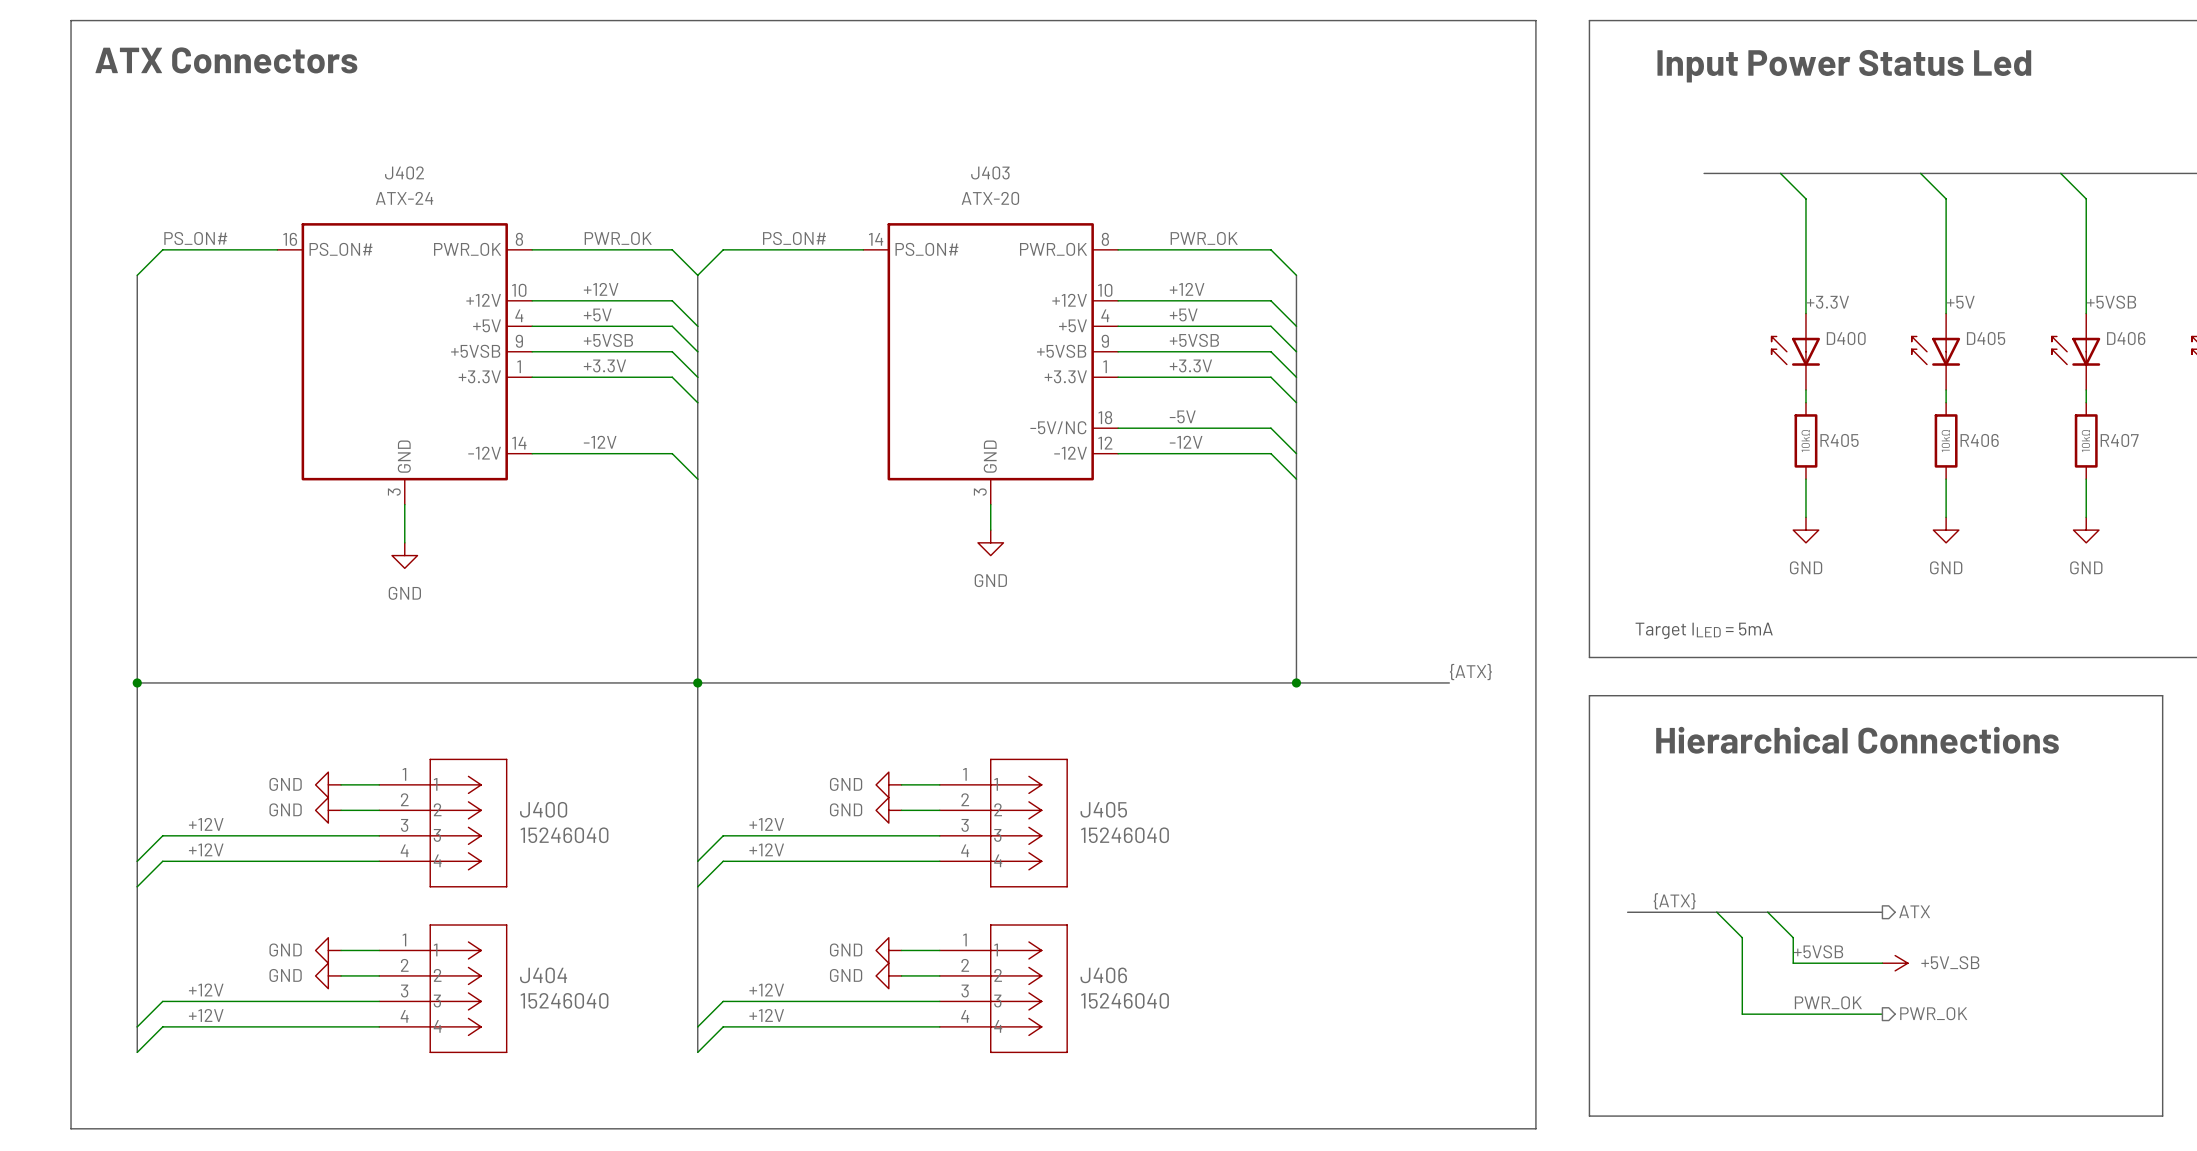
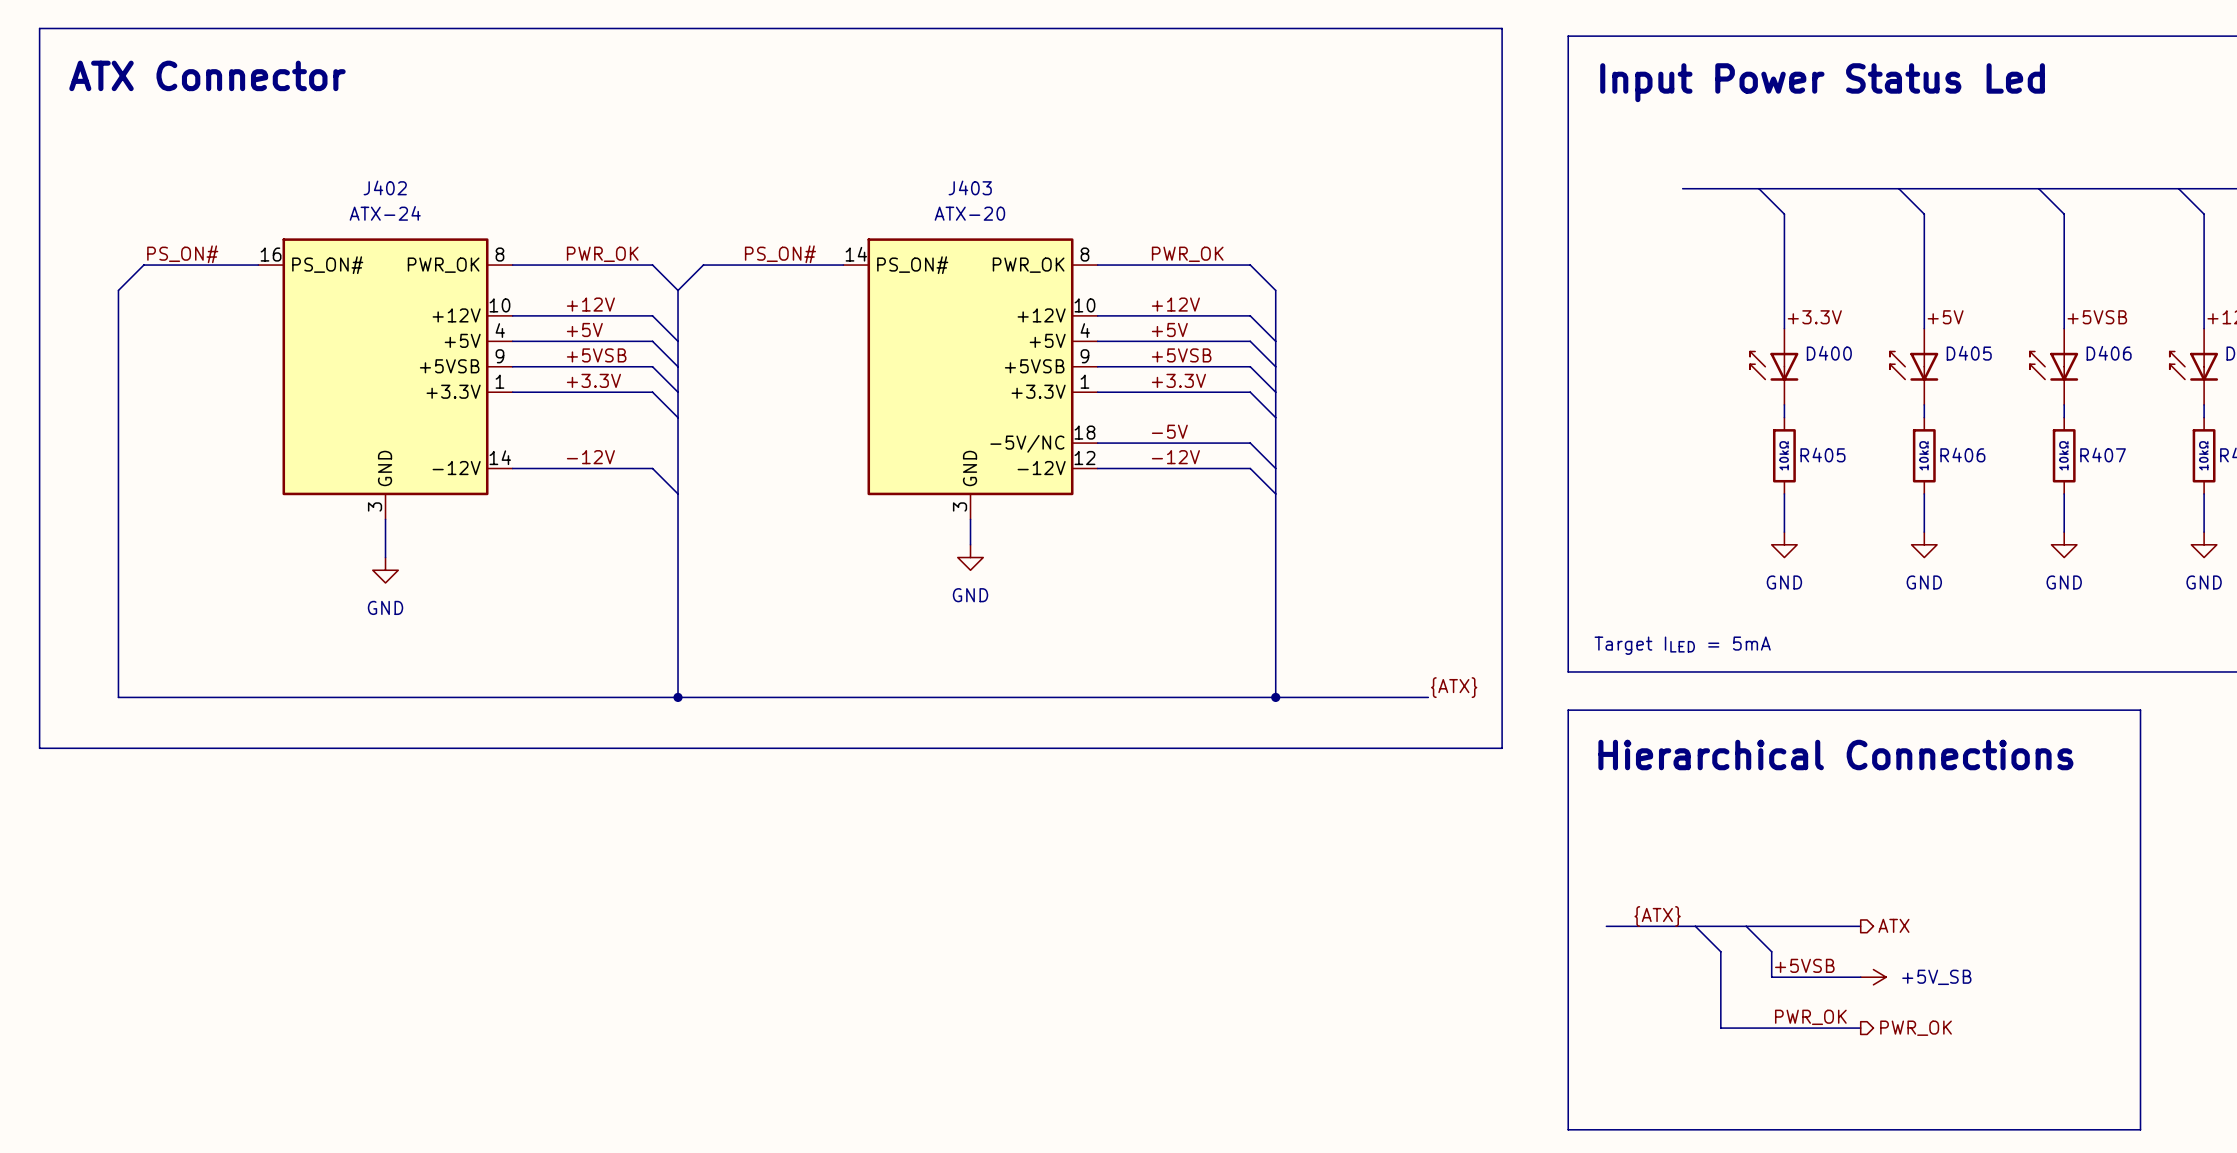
line: (71, 20) (1535, 20) (1535, 1128) (71, 1128) (71, 20) -> (39, 28) (39, 748) (1502, 748) (1502, 28) (39, 28)
text: ATX Connectors (226, 60) -> ATX Connector (207, 75)
bus: (137, 682) (137, 1052) -> none
junction: (137, 682) -> none
bus: (697, 682) (697, 1052) -> none
power symbol: GND (328, 784) -> none
wire: (341, 784) (379, 784) -> none
power symbol: GND (888, 784) -> none
wire: (901, 784) (939, 784) -> none
power symbol: GND (328, 810) -> none
wire: (341, 810) (379, 810) -> none
power symbol: GND (888, 810) -> none
wire: (901, 810) (939, 810) -> none
J400: 15246040 (443, 823) -> none
J405: 15246040 (1003, 823) -> none
label: +12V (206, 824) -> none
label: +12V (766, 824) -> none
wire: (379, 835) (162, 835) (137, 861) -> none
wire: (939, 835) (723, 835) (697, 861) -> none
label: +12V (206, 849) -> none
label: +12V (766, 849) -> none
wire: (379, 861) (162, 861) (137, 886) -> none
wire: (939, 861) (723, 861) (697, 886) -> none
power symbol: GND (328, 950) -> none
wire: (341, 950) (379, 950) -> none
power symbol: GND (888, 950) -> none
wire: (901, 950) (939, 950) -> none
power symbol: GND (328, 975) -> none
wire: (341, 975) (379, 975) -> none
power symbol: GND (888, 975) -> none
wire: (901, 975) (939, 975) -> none
J404: 15246040 (443, 988) -> none
J406: 15246040 (1003, 988) -> none
label: +12V (206, 989) -> none
label: +12V (766, 989) -> none
wire: (379, 1001) (162, 1001) (137, 1026) -> none
wire: (939, 1001) (723, 1001) (697, 1026) -> none
label: +12V (206, 1015) -> none
label: +12V (766, 1015) -> none
wire: (379, 1026) (162, 1026) (137, 1052) -> none
wire: (939, 1026) (723, 1026) (697, 1052) -> none

